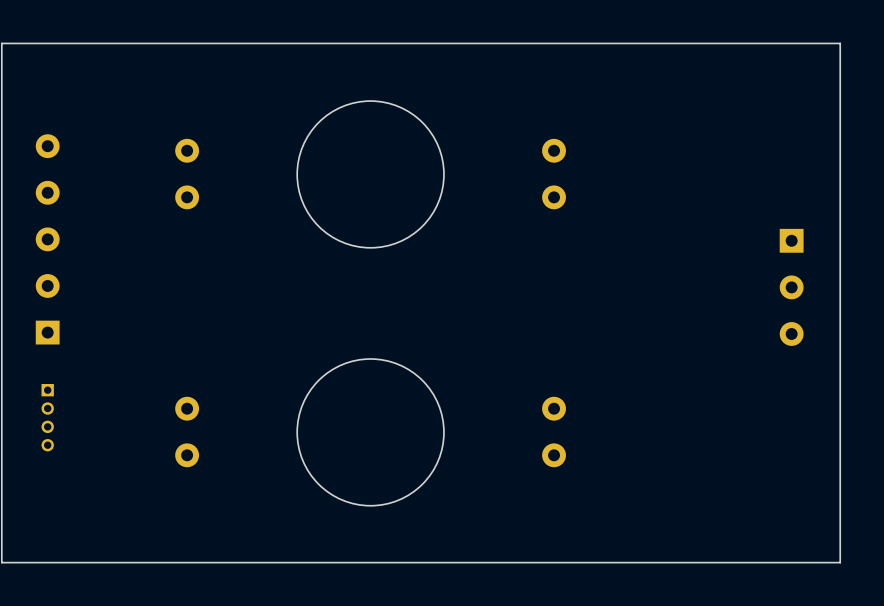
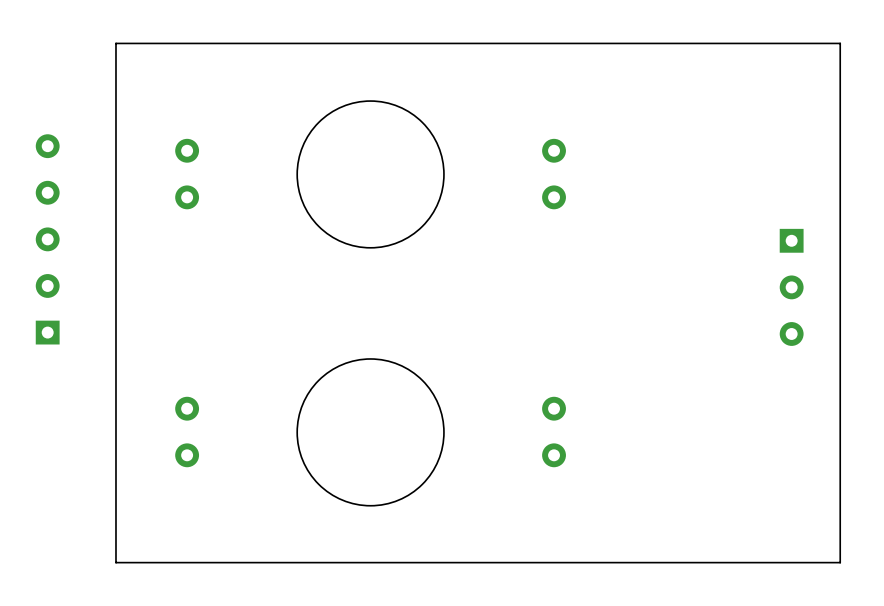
board edge: (115, 43) (1, 43) (1, 562) (115, 562) -> (115, 43) (115, 562)
part: (47, 417) -> none

